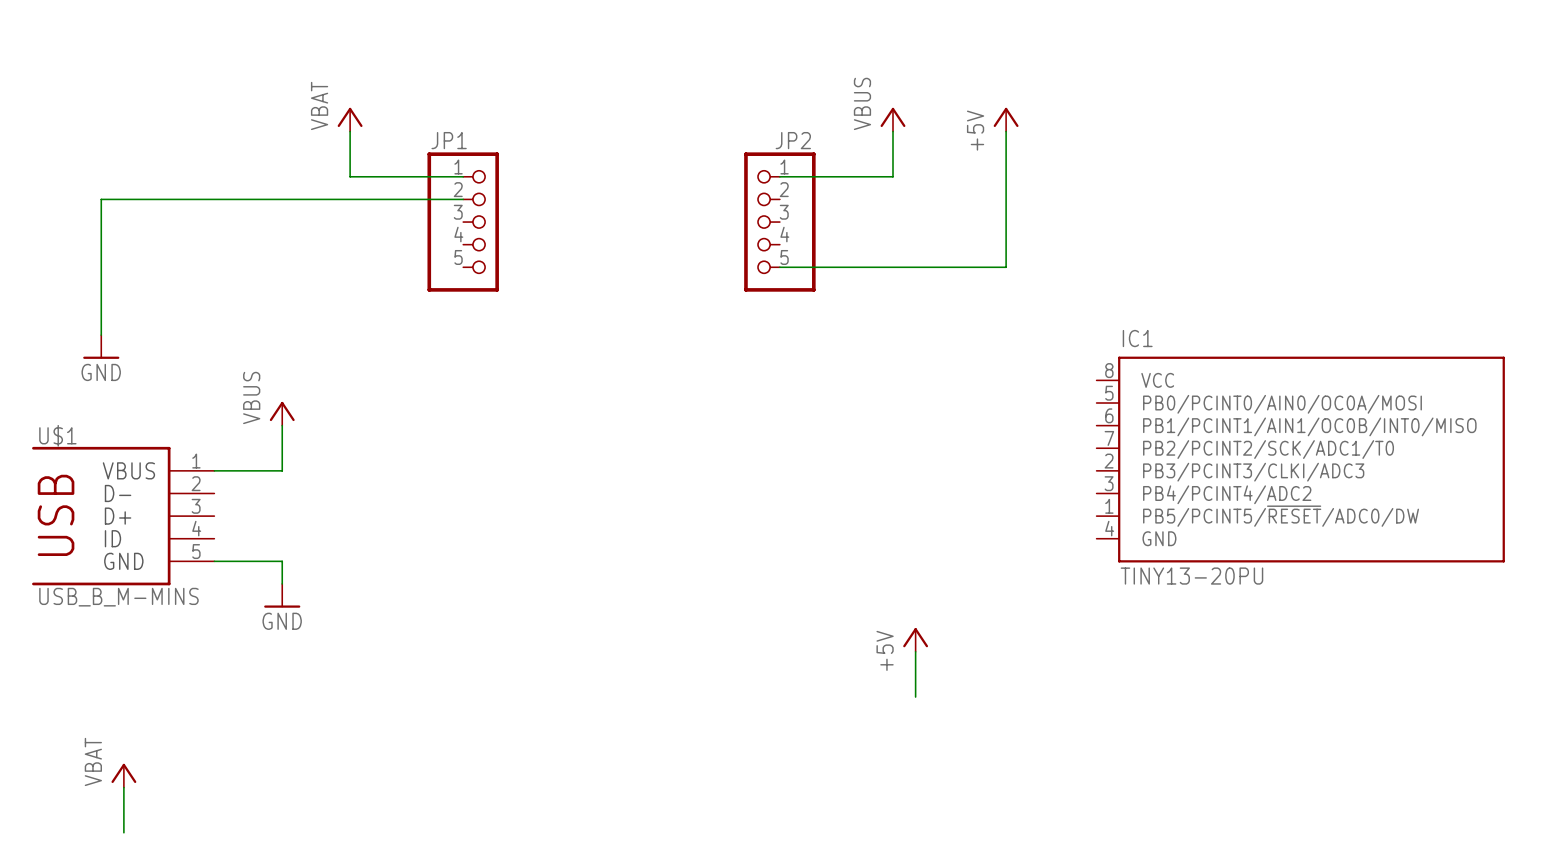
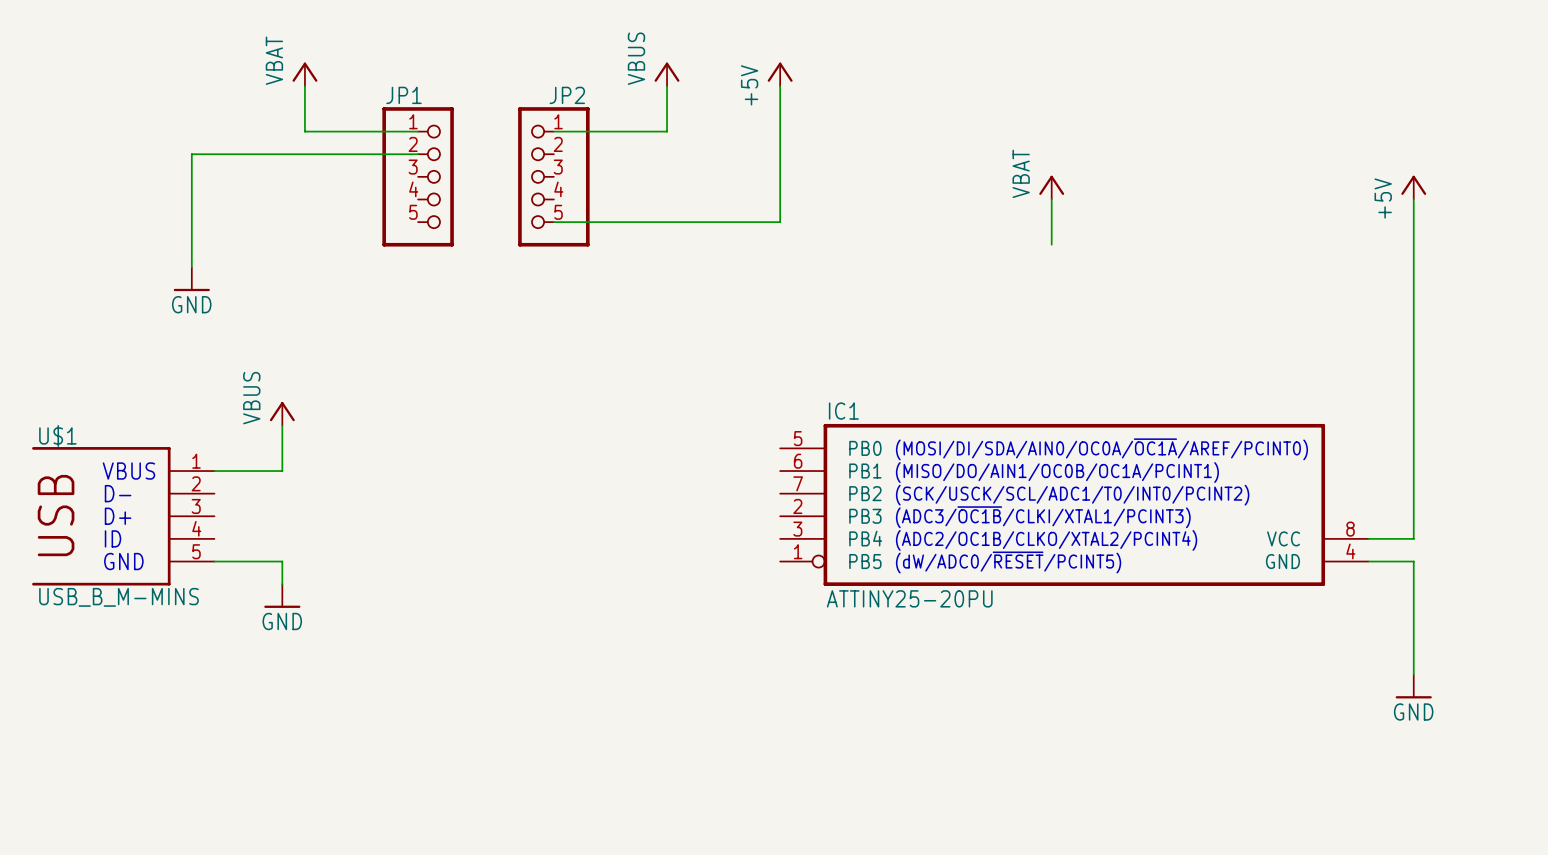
power symbol: none -> VBUS (667, 74)
power symbol: none -> +5V (780, 74)
wire: none -> (667, 86) (667, 131) (553, 131)
wire: none -> (780, 86) (780, 222) (553, 222)
power symbol position: VBAT (350, 119) -> VBAT (304, 74)
power symbol: VBUS (892, 119) -> none
power symbol: +5V (1006, 119) -> none
wire: (350, 131) (350, 176) (463, 176) -> (304, 86) (304, 131) (418, 131)
wire: (892, 131) (892, 176) (779, 176) -> none
wire: (1006, 131) (1006, 267) (779, 267) -> none
wire: none -> (418, 154) (191, 154) (191, 267)
power symbol: none -> VBAT (1051, 187)
power symbol: none -> +5V (1413, 187)
wire: (463, 199) (101, 199) (101, 335) -> none
wire: none -> (1051, 199) (1051, 244)
wire: none -> (1413, 199) (1413, 538) (1368, 538)
JP1 position: (463, 222) -> (418, 176)
JP2 position: (779, 222) -> (553, 176)
IC1 name position: IC1 (1137, 338) -> IC1 (843, 411)
power symbol position: GND (101, 347) -> GND (191, 279)
IC1 symbol: [1096, 356, 1505, 563] -> [780, 423, 1369, 586]
wire: none -> (1368, 561) (1413, 561) (1413, 674)
IC1 value: TINY13-20PU (1191, 576) -> ATTINY25-20PU (909, 598)
power symbol: +5V (915, 639) -> none
wire: (915, 651) (915, 697) -> none
power symbol: none -> GND (1413, 686)
power symbol: VBAT (123, 775) -> none
wire: (123, 787) (123, 832) -> none

